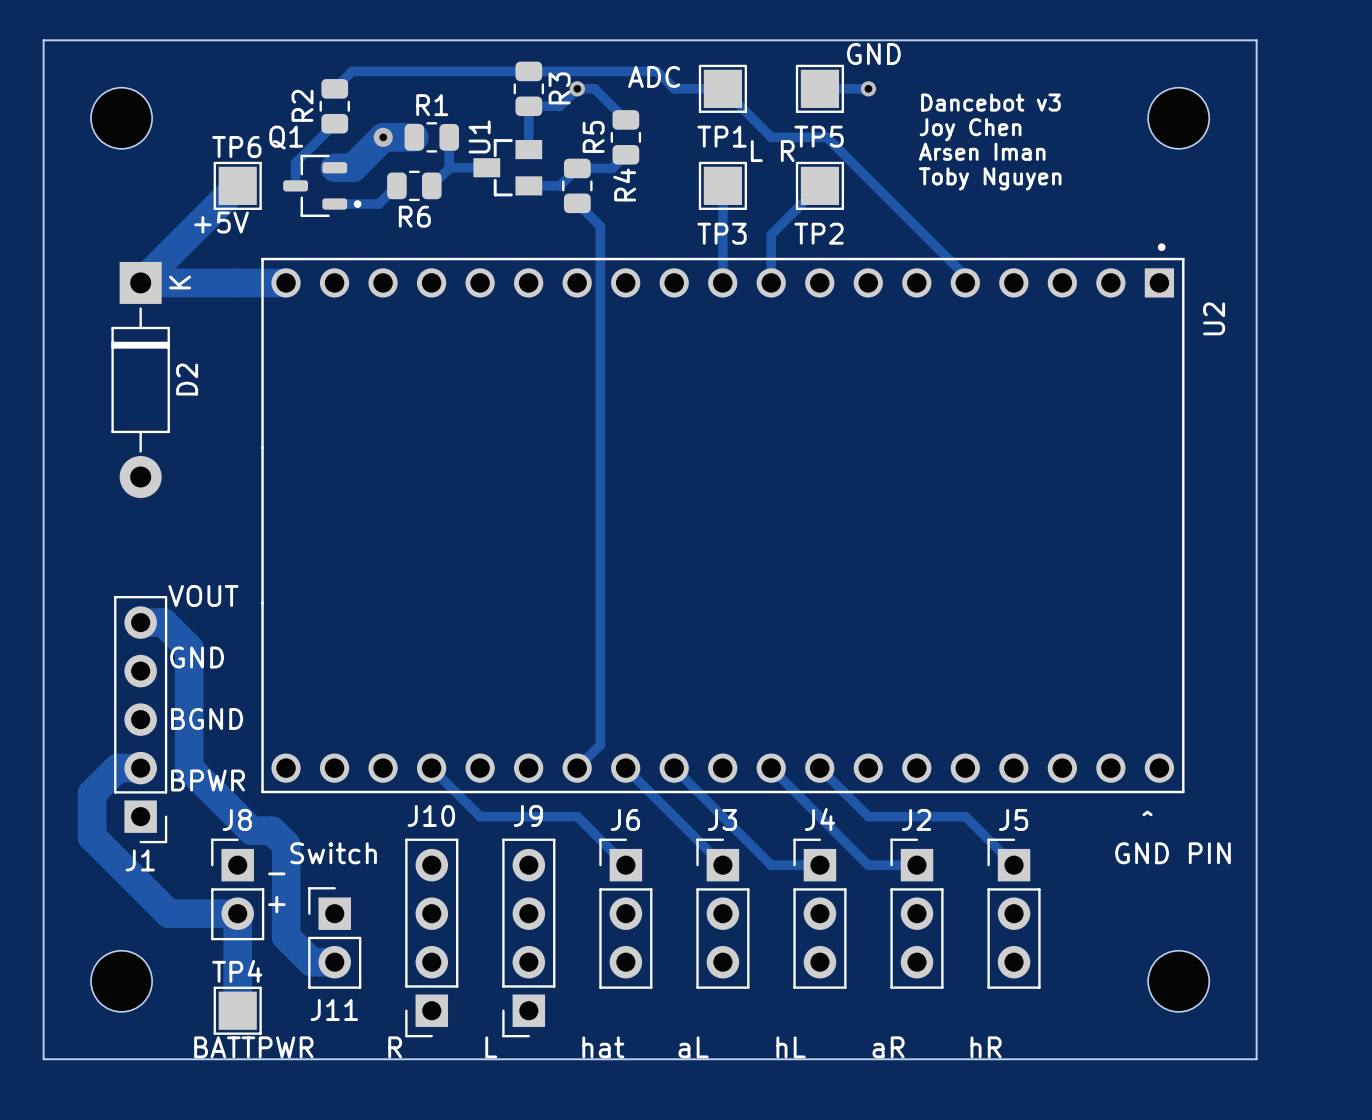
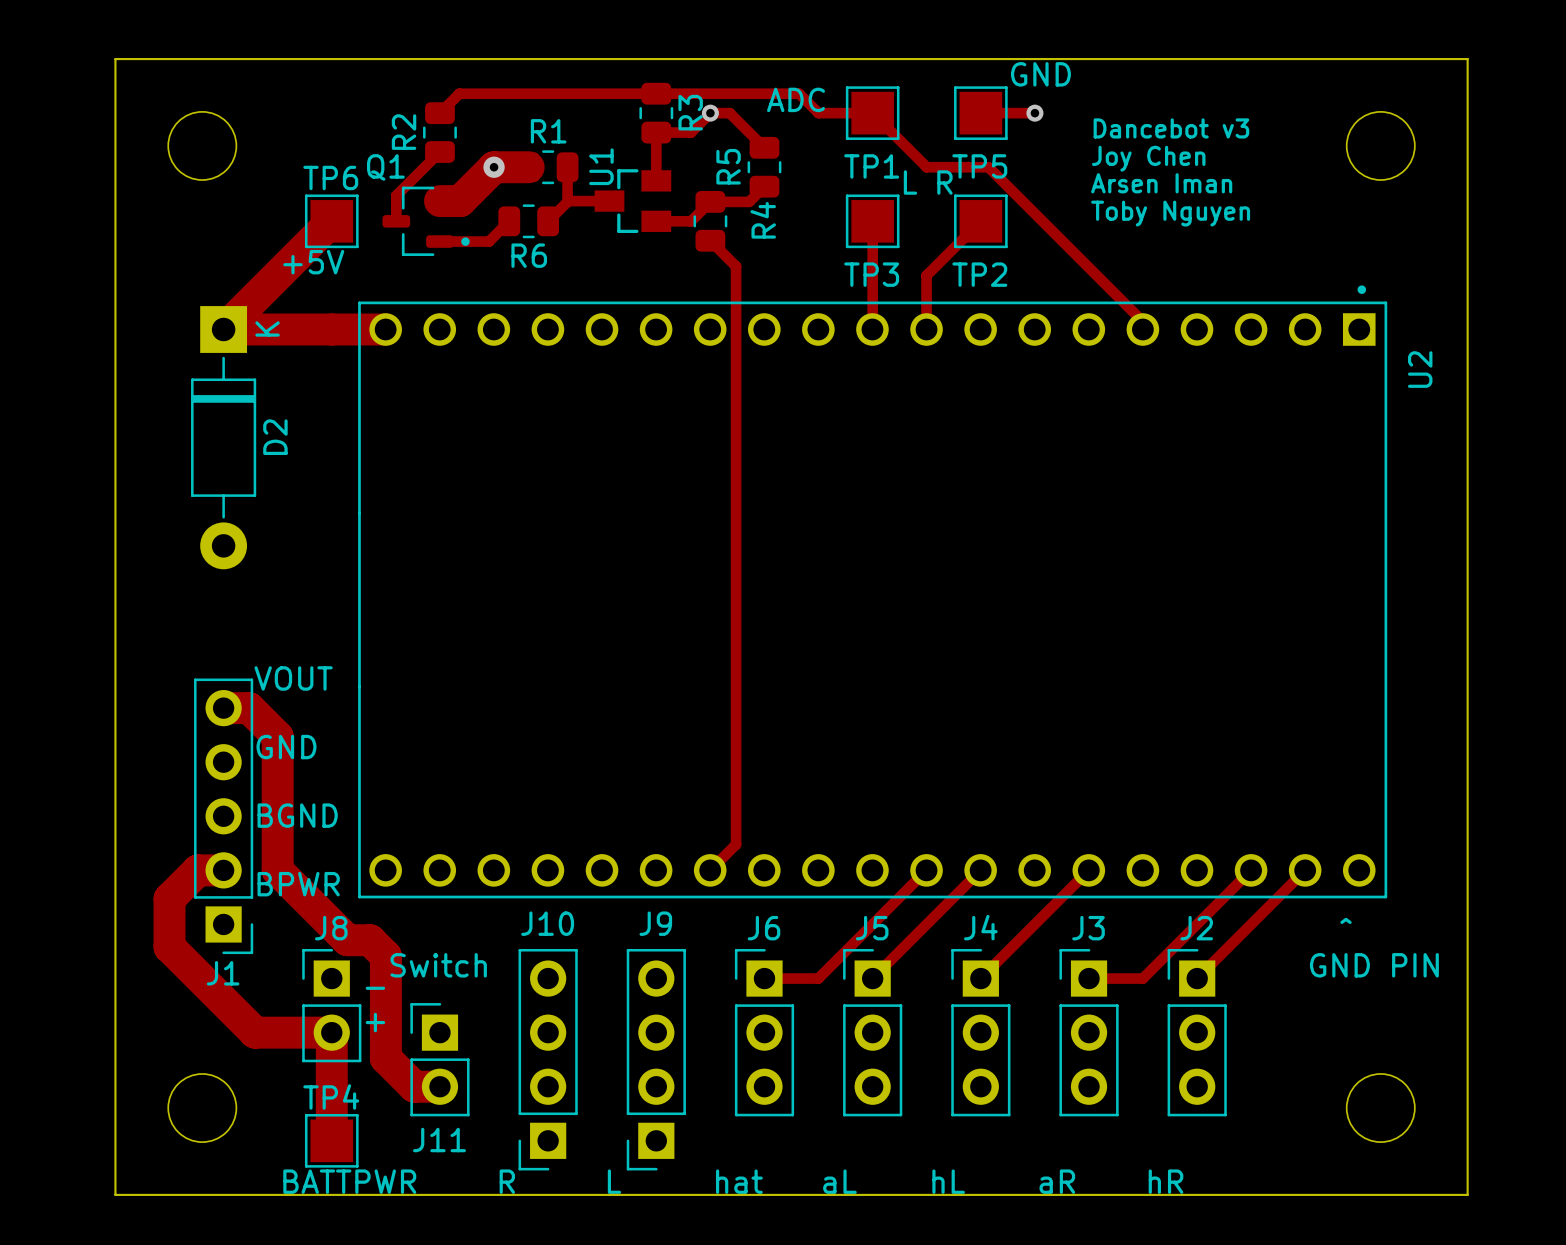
track: (431, 768) (480, 816) (577, 816) (625, 865) -> (926, 870) (818, 978) (764, 978)
track: (625, 768) (722, 865) -> (980, 870) (872, 978)
track: (674, 768) (771, 865) (819, 865) -> (1088, 870) (980, 978)
track: (771, 768) (868, 865) (916, 865) -> (1251, 870) (1142, 978) (1089, 978)
track: (819, 768) (868, 816) (965, 816) (1014, 865) -> (1305, 870) (1197, 978)
J3 name: J3 (722, 819) -> J5 (872, 928)
J2 name: J2 (916, 819) -> J3 (1088, 928)
J5 name: J5 (1013, 819) -> J2 (1196, 928)

